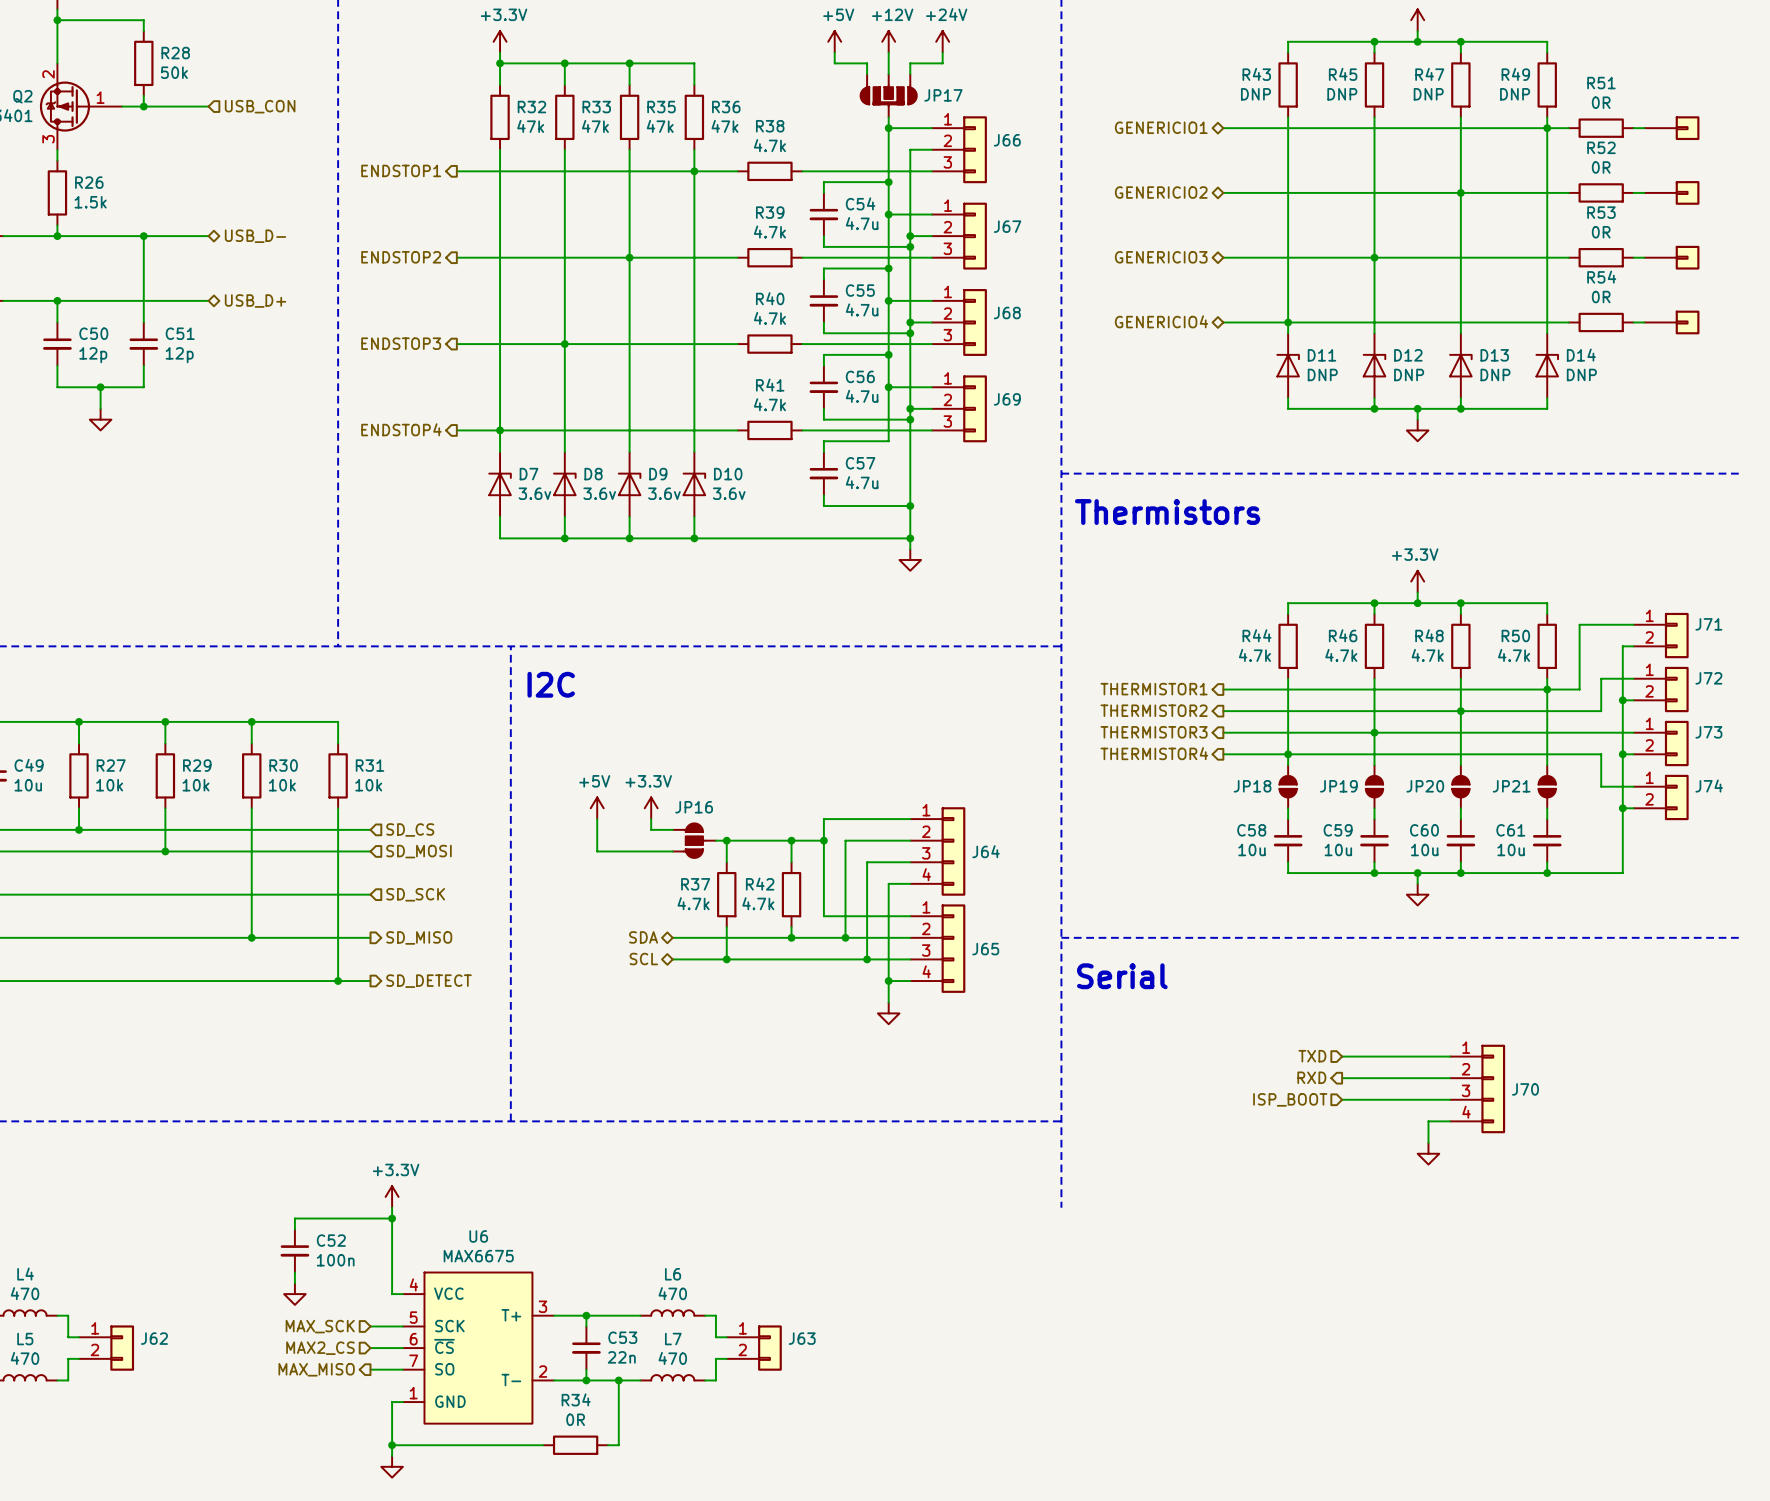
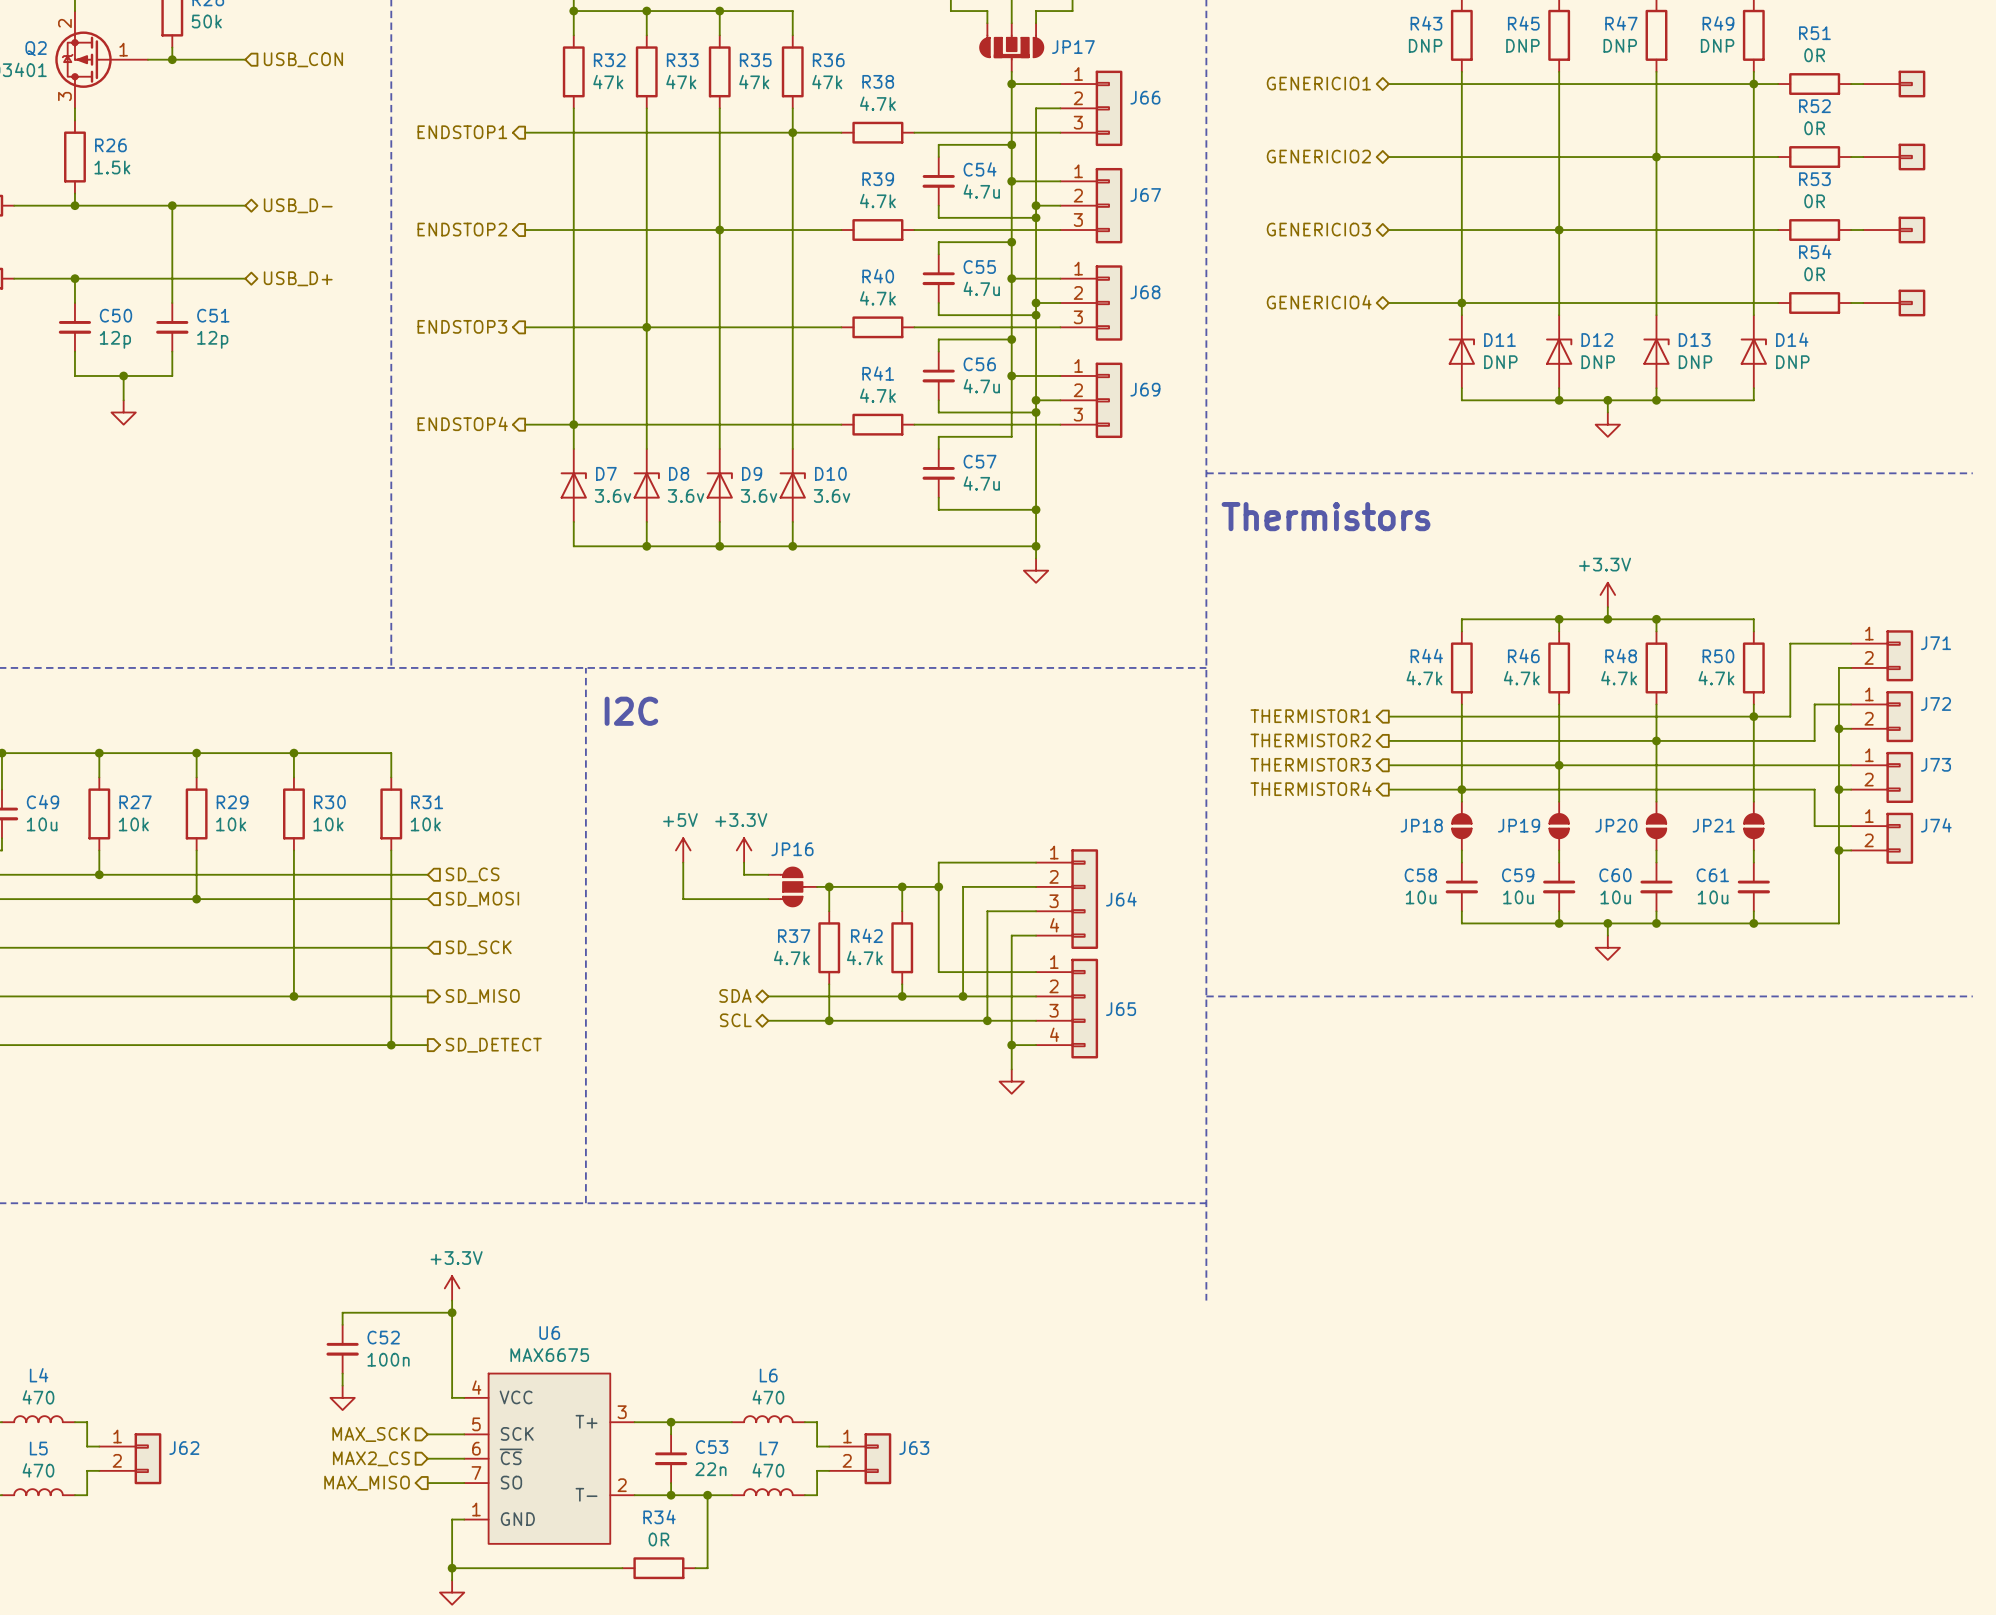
text: Serial (1122, 976) -> none
hierarchical label: TXD (1312, 1056) -> none
wire: (1342, 1056) (1450, 1056) -> none
hierarchical label: RXD (1311, 1077) -> none
wire: (1342, 1078) (1450, 1078) -> none
J70: (1477, 1088) -> none
hierarchical label: ISP_BOOT (1290, 1099) -> none
wire: (1342, 1099) (1450, 1099) -> none
wire: (1450, 1121) (1428, 1121) (1428, 1142) -> none
power symbol: (1428, 1153) -> none

